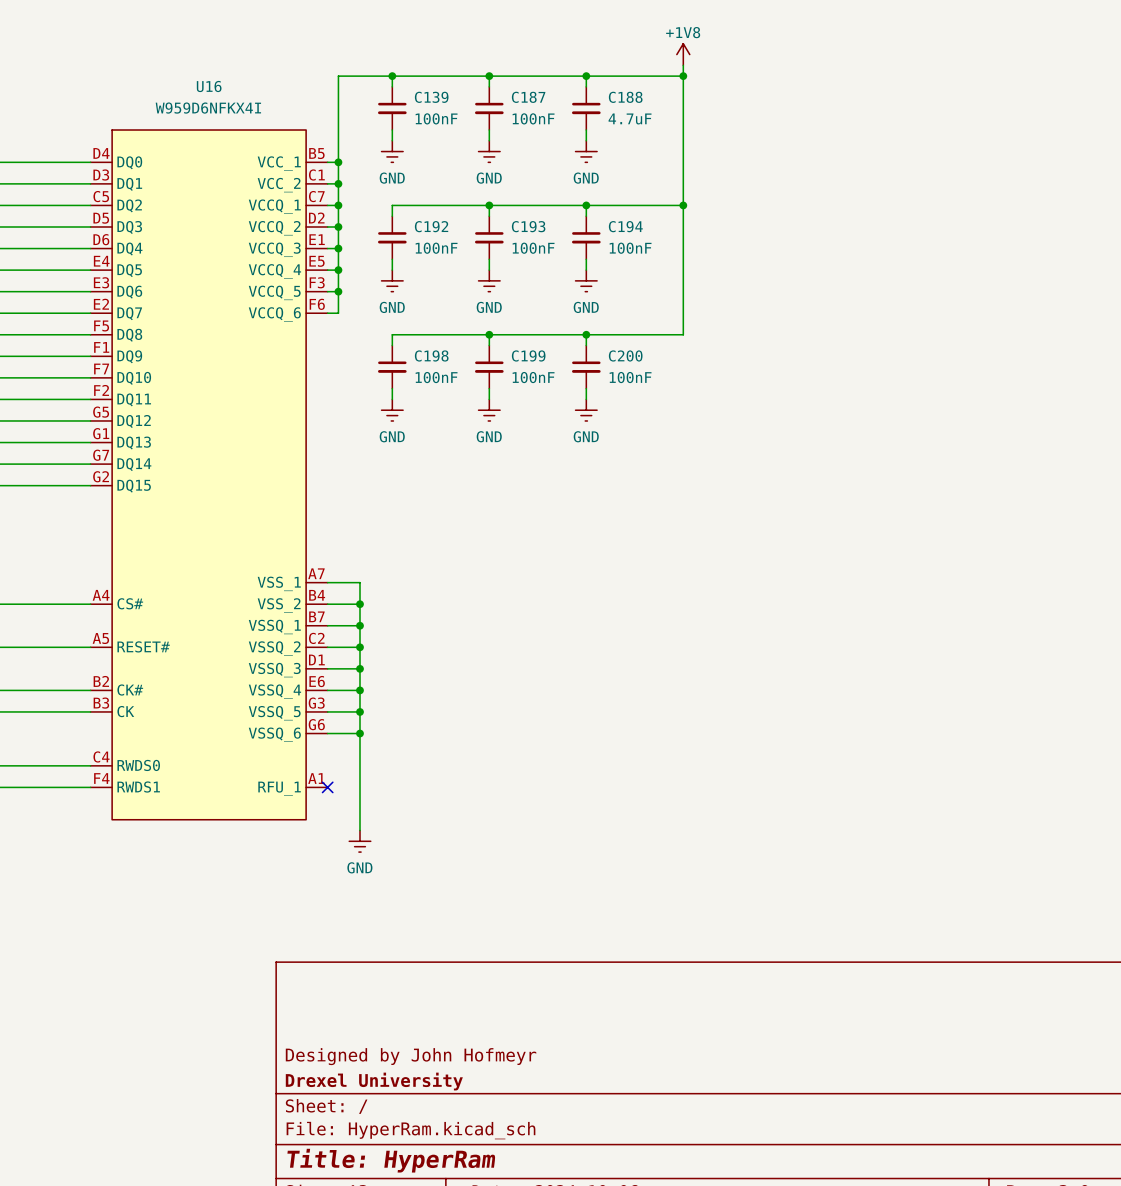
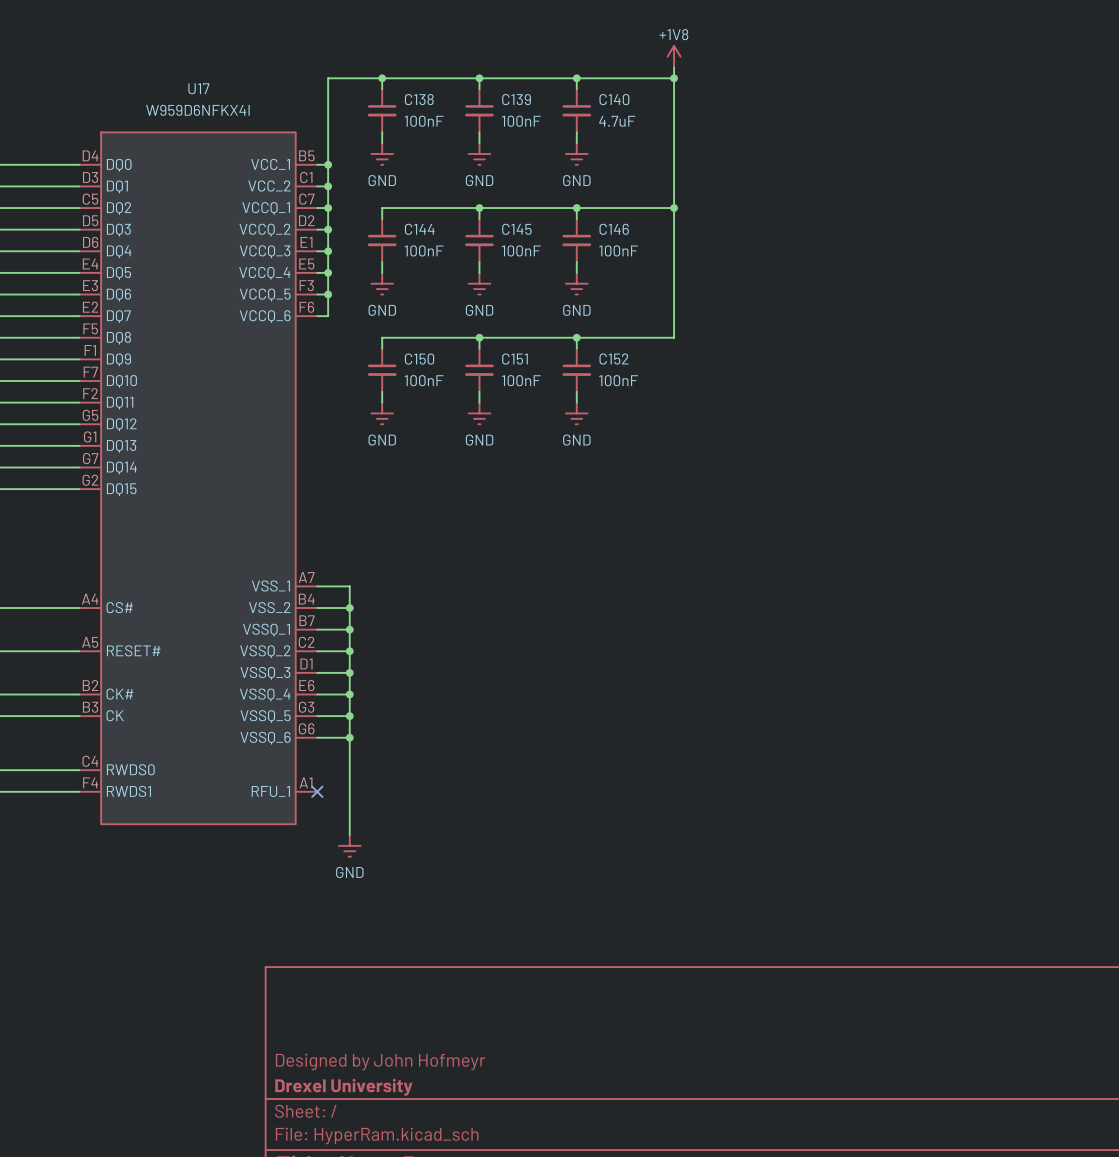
U16 name: U16 (209, 86) -> U17 (198, 88)
C139 name: C139 (431, 97) -> C138 (419, 99)
C187 name: C187 (528, 97) -> C139 (516, 99)
C188 name: C188 (625, 97) -> C140 (614, 99)
C192 name: C192 (431, 226) -> C144 (419, 229)
C193 name: C193 (528, 226) -> C145 (516, 229)
C194 name: C194 (625, 226) -> C146 (614, 229)
C198 name: C198 (431, 355) -> C150 (419, 359)
C199 name: C199 (528, 355) -> C151 (515, 359)
C200 name: C200 (625, 355) -> C152 (614, 359)

